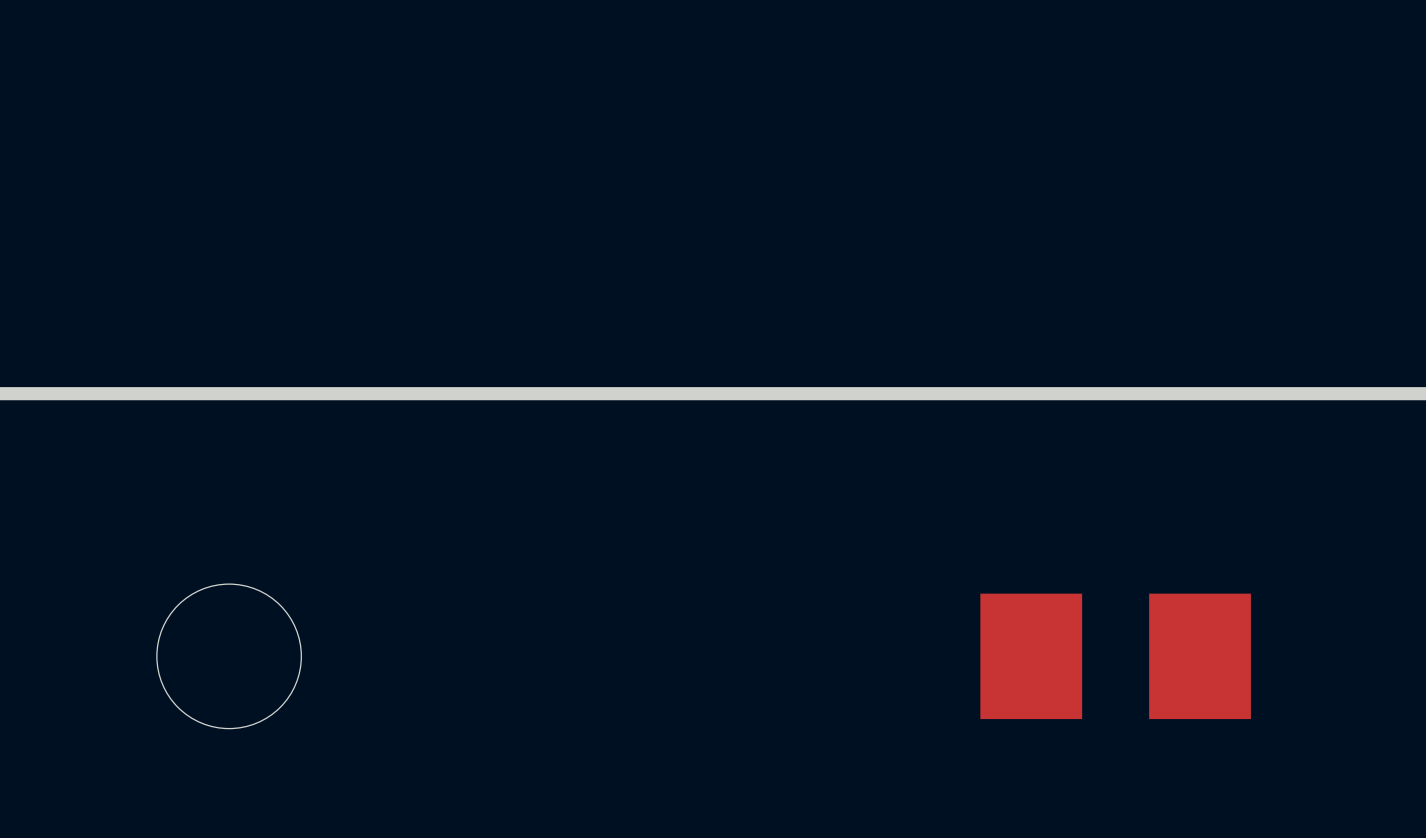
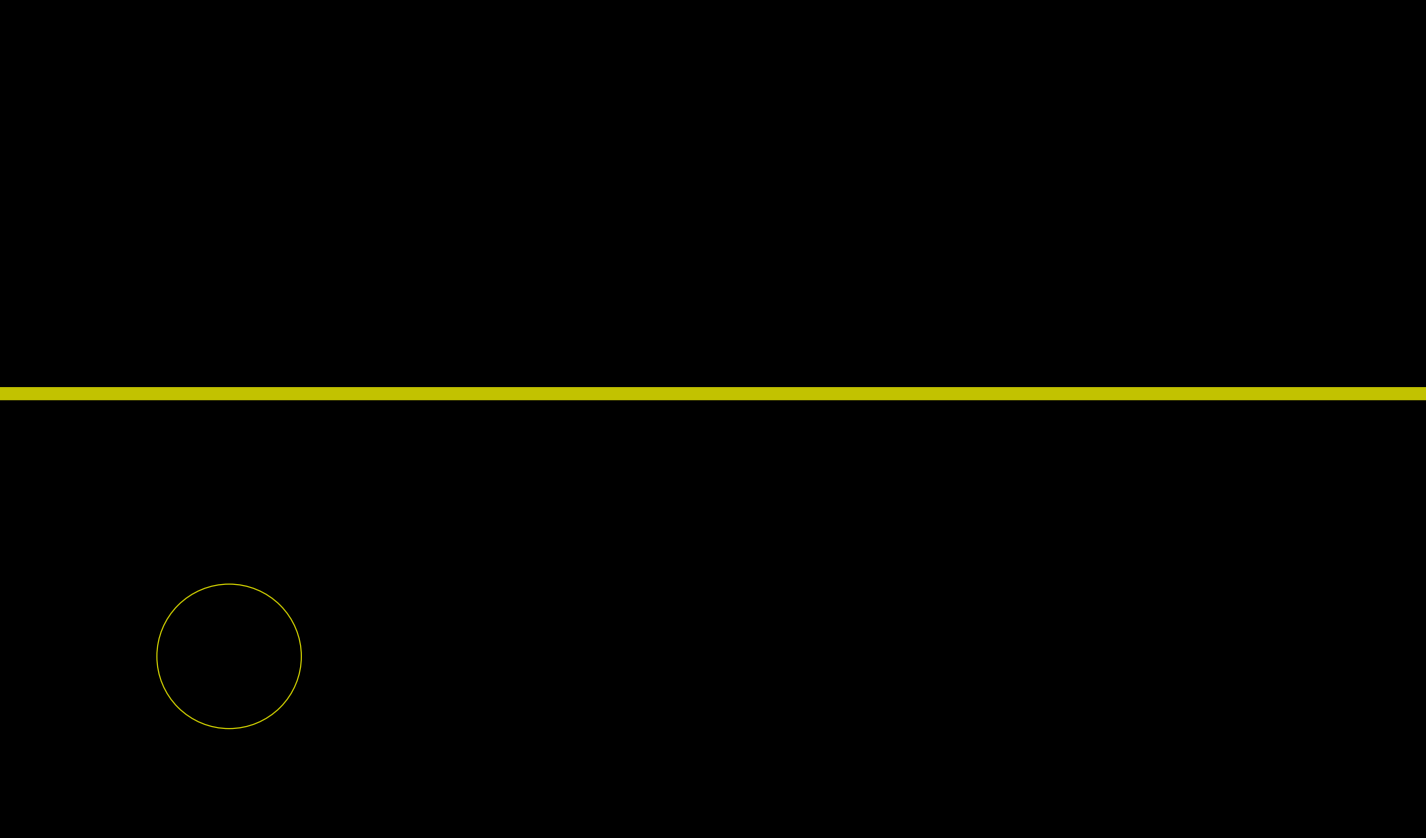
part: (1115, 656) -> none

